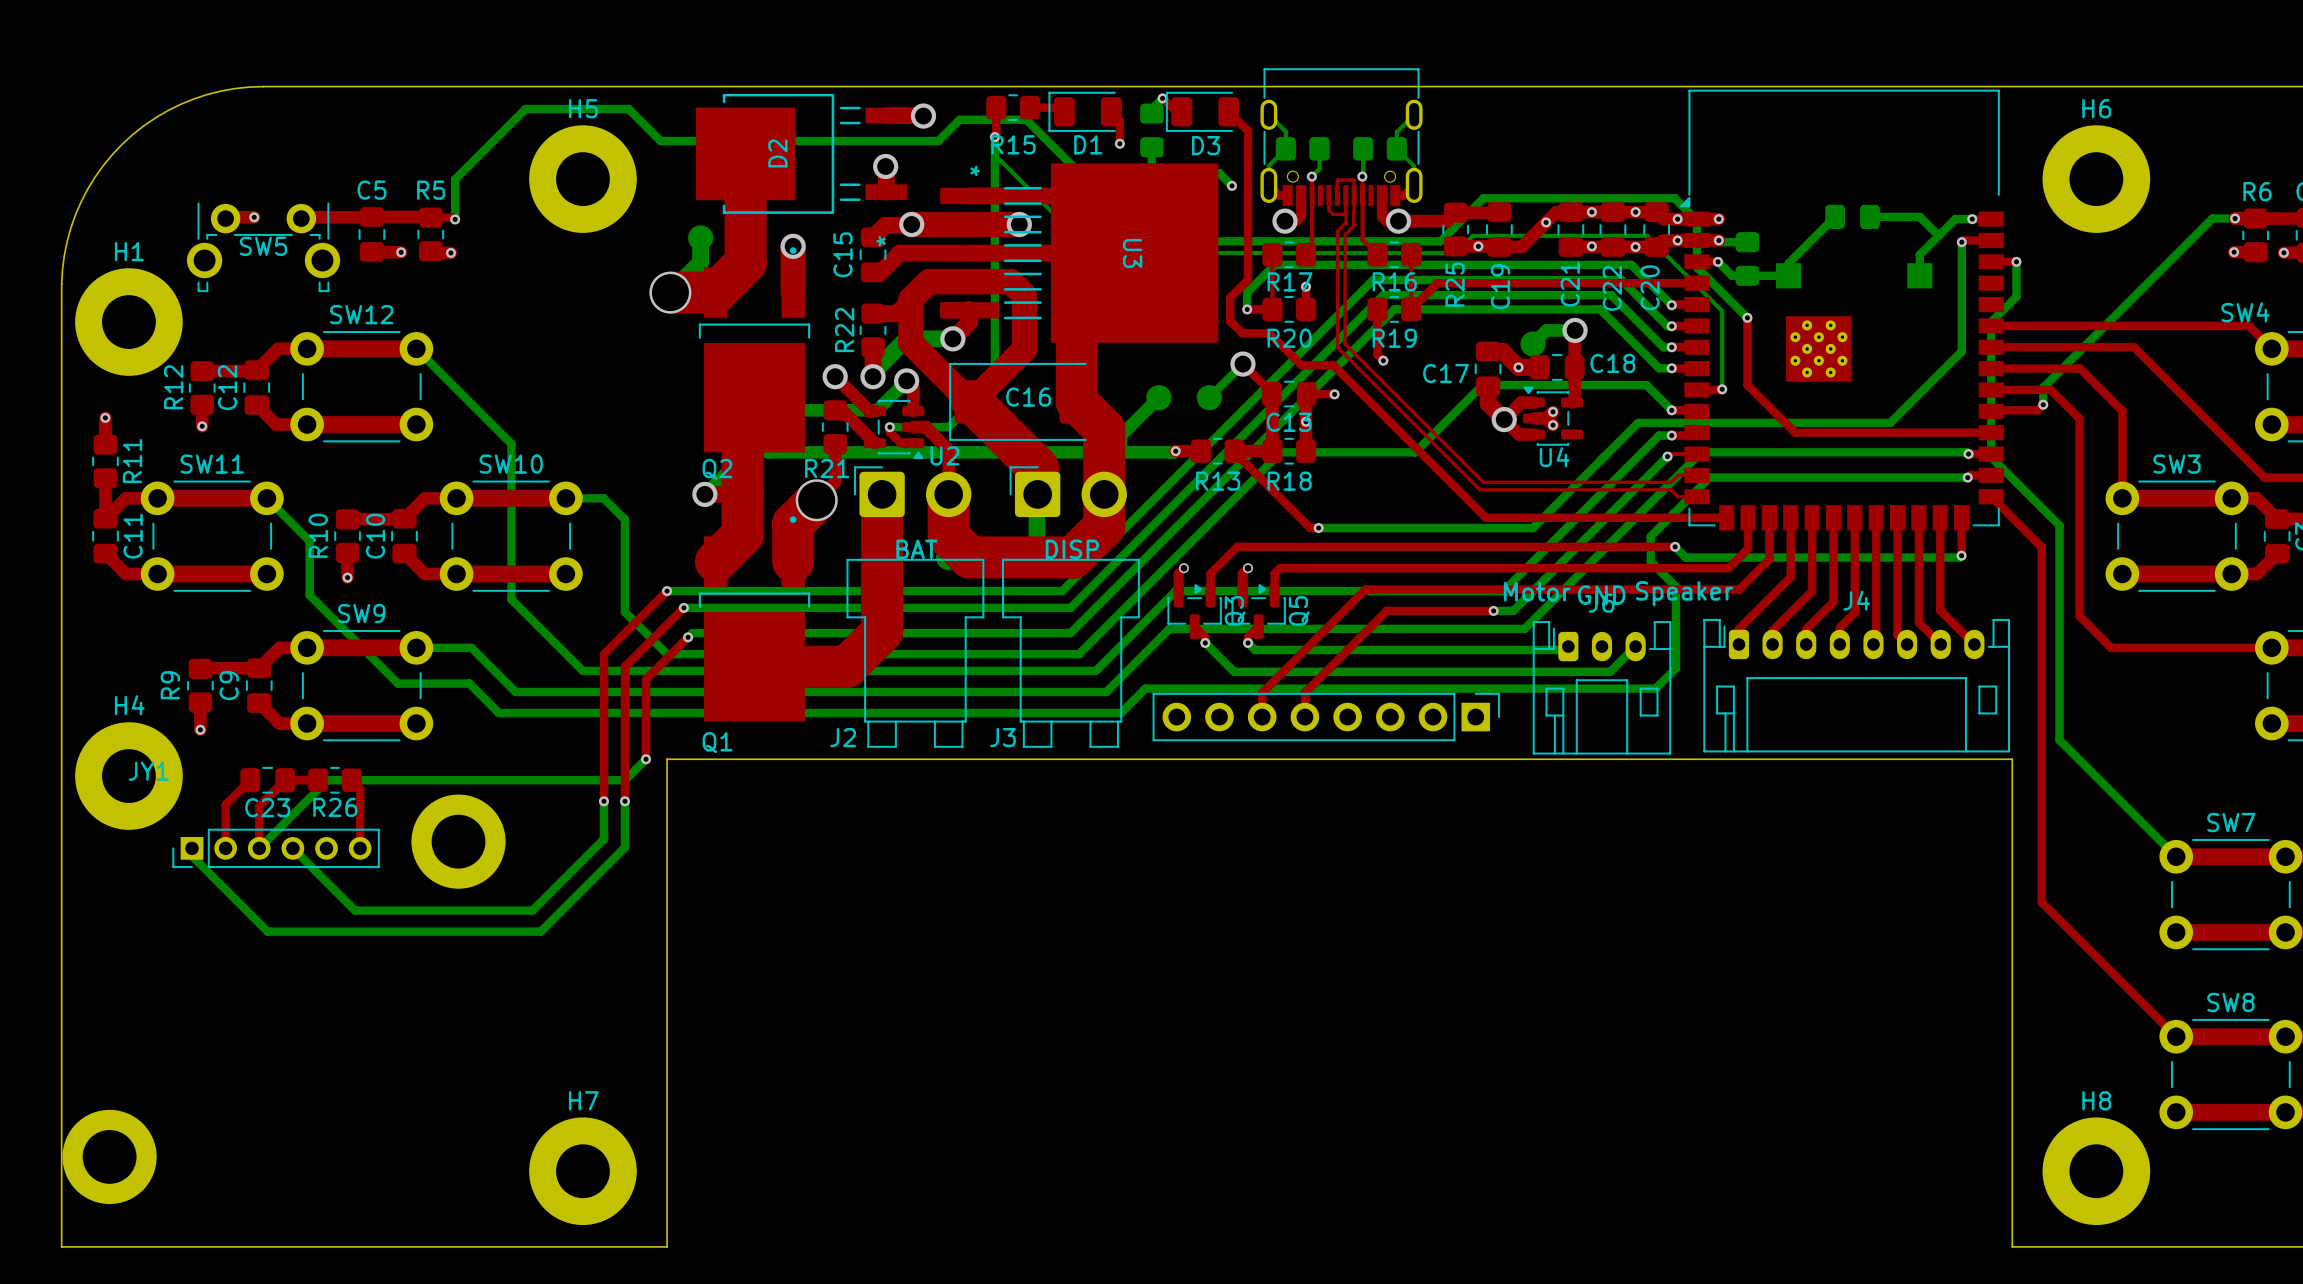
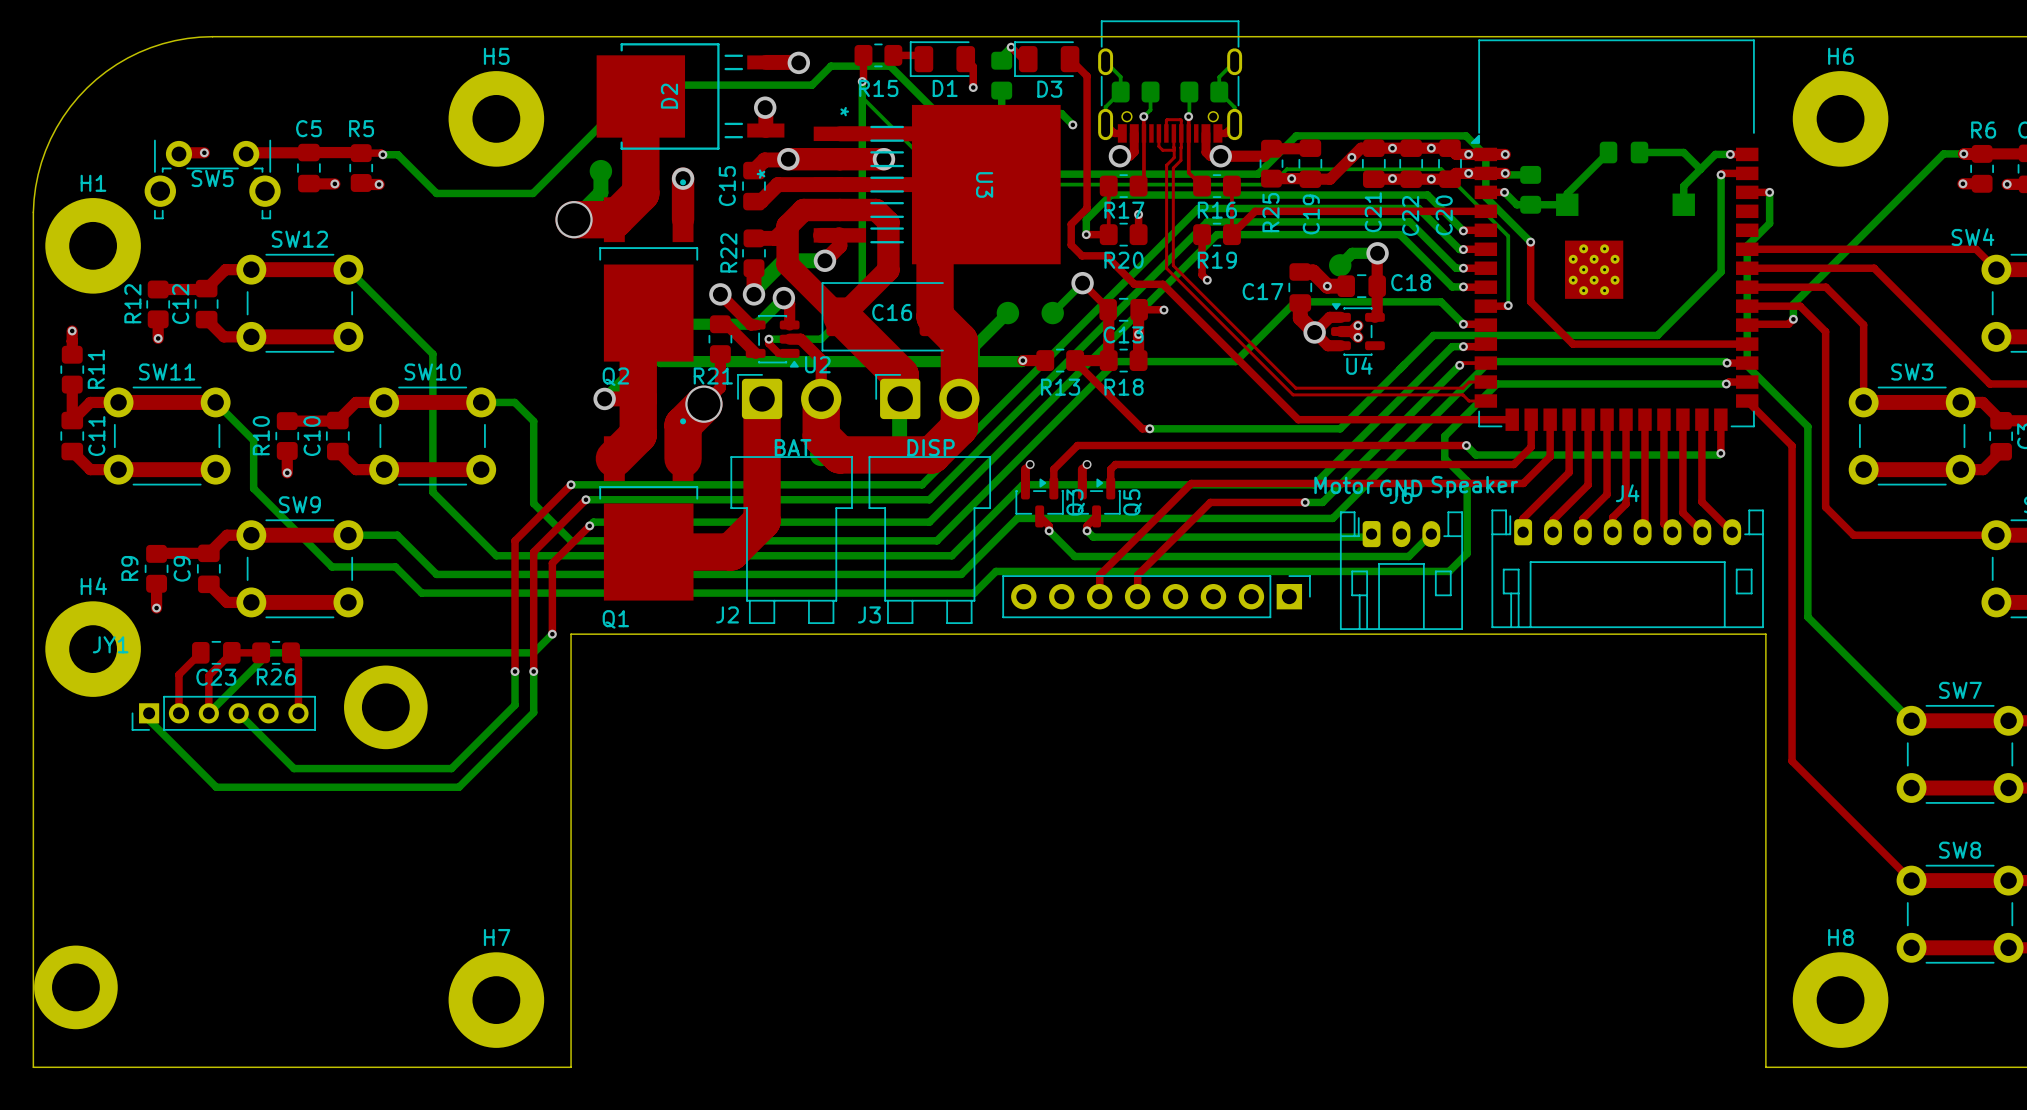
bottom track: (746, 141) (660, 141) (628, 109) (525, 109) (455, 179) (455, 219) -> (641, 85) (532, 193) (436, 193) (397, 154) (382, 154)

